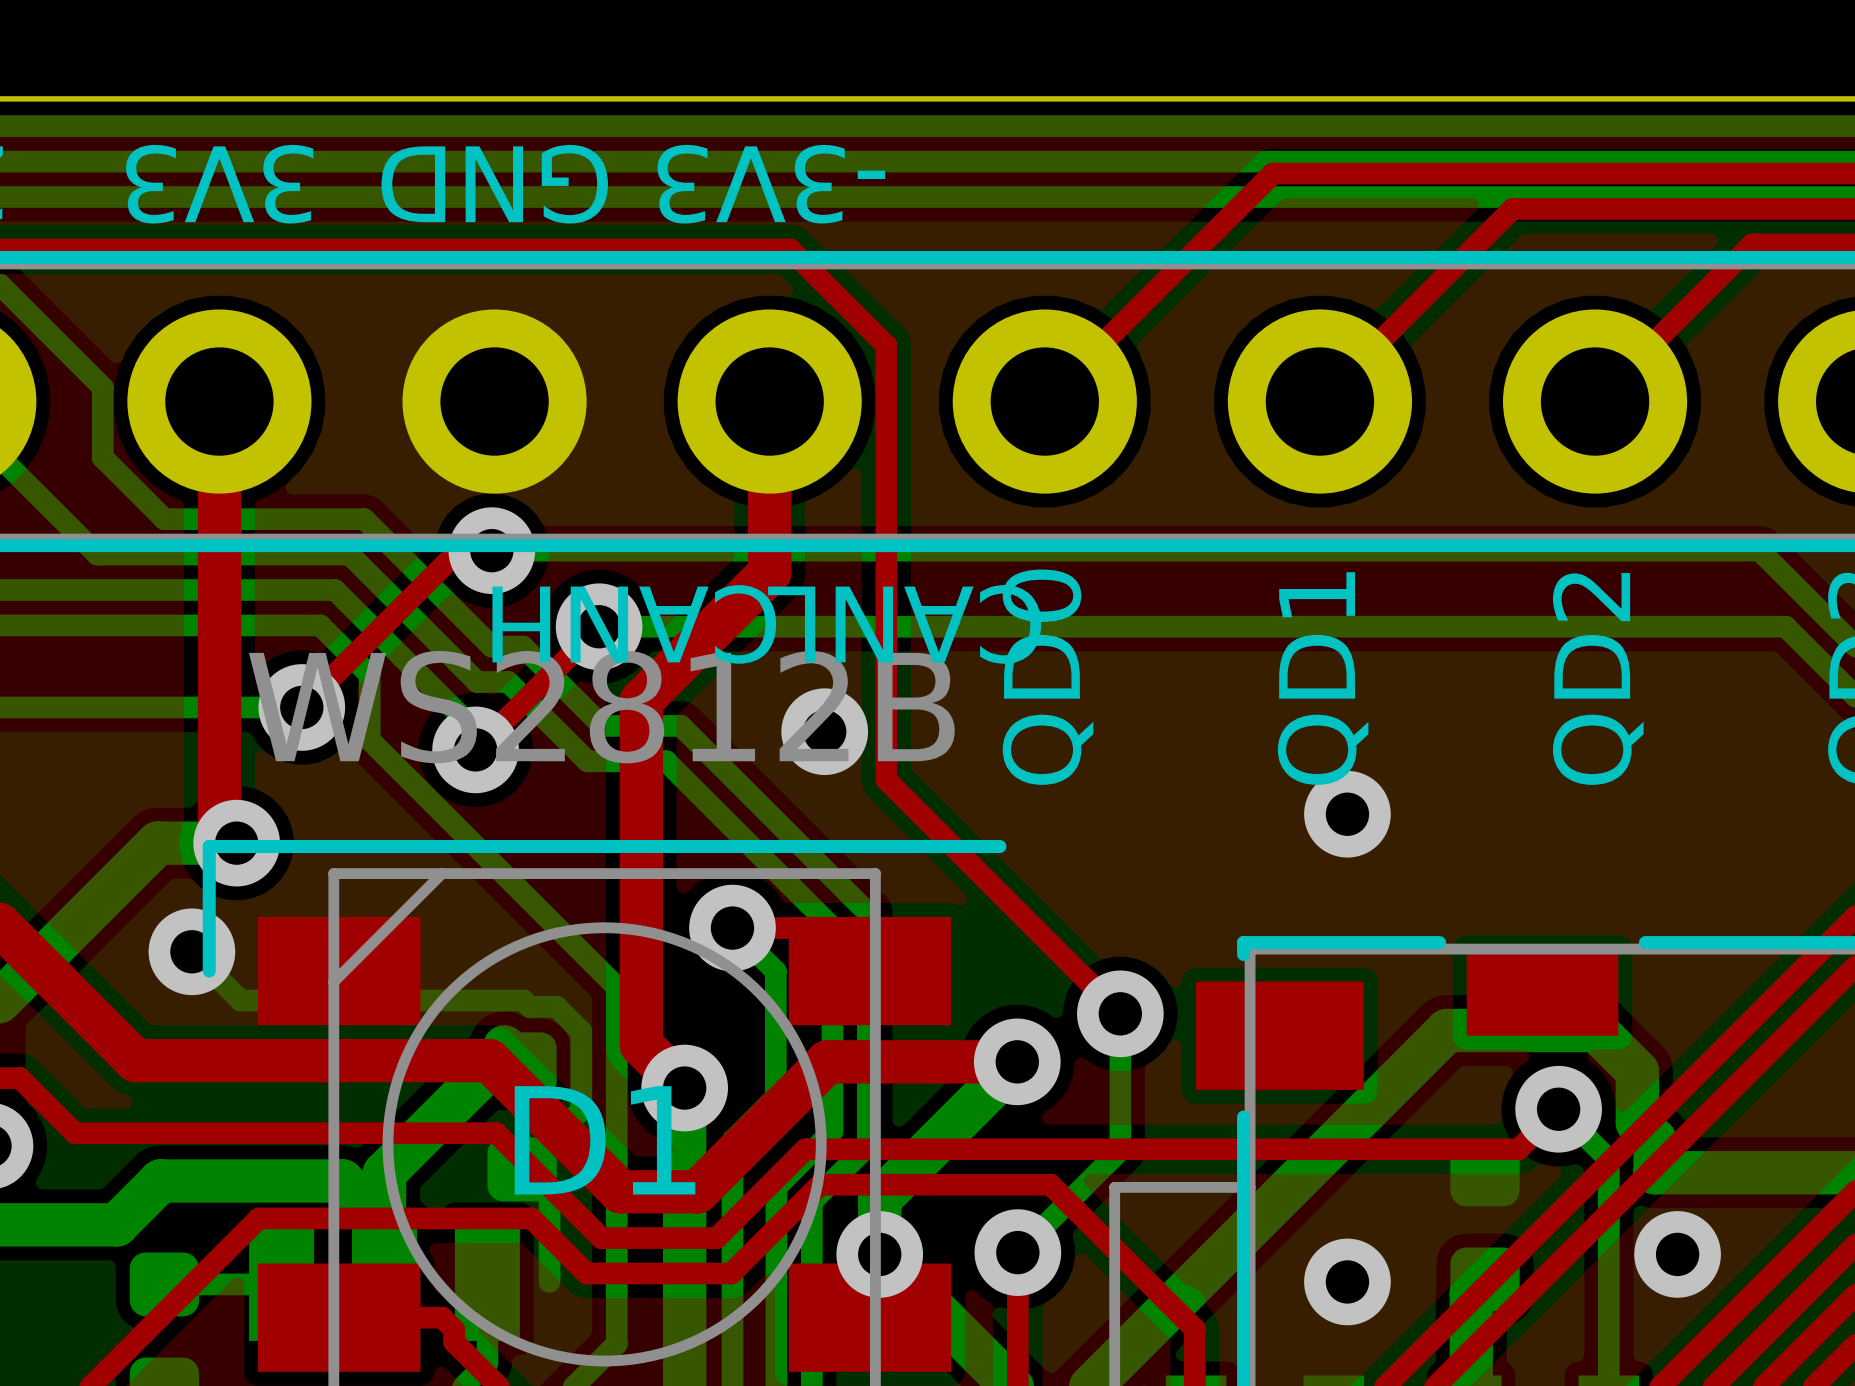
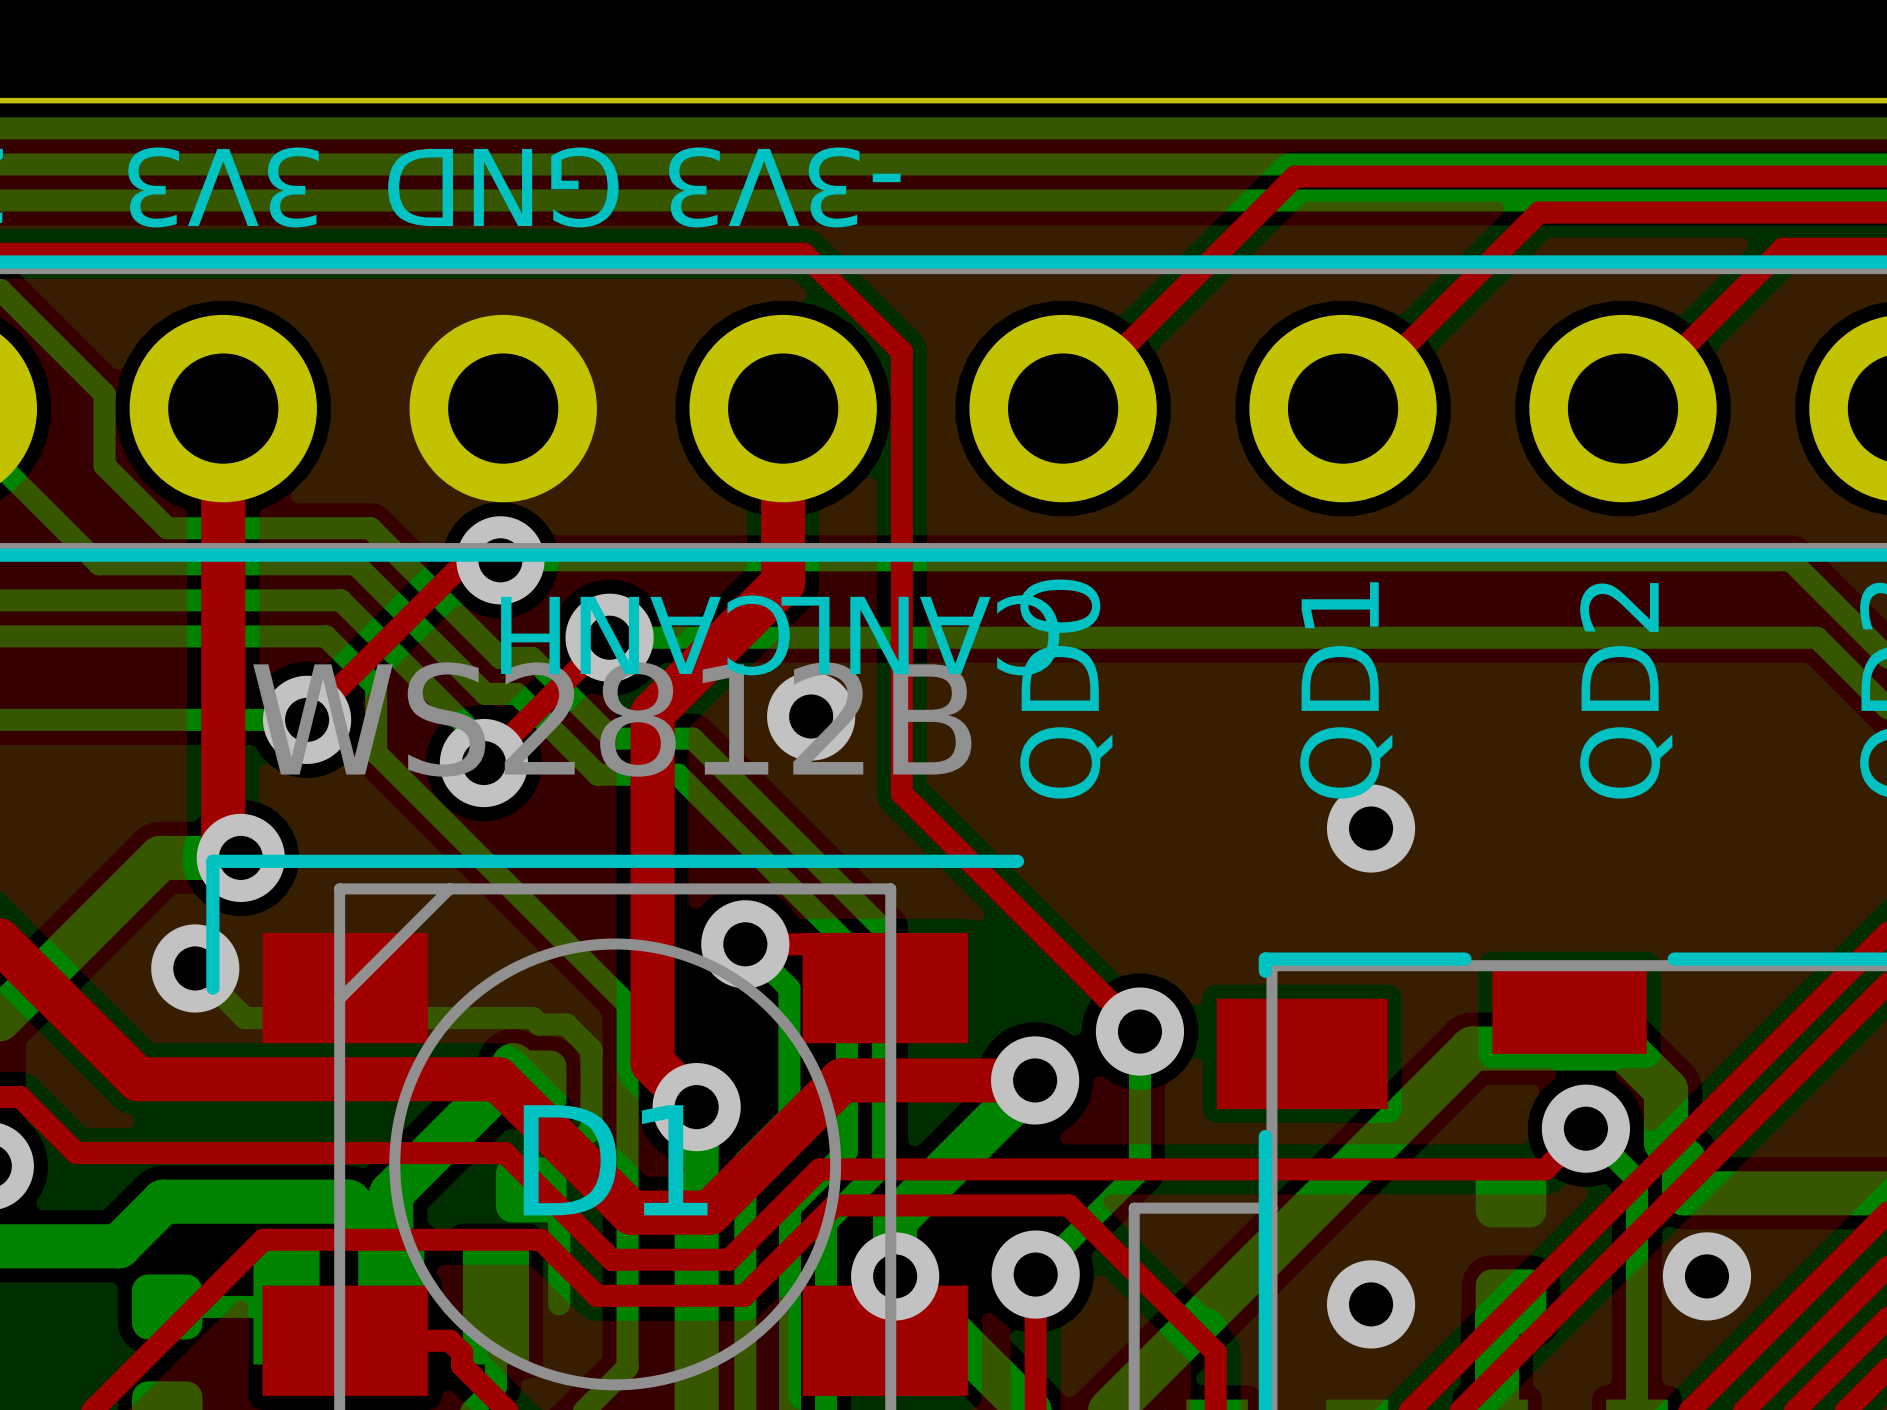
via position: (824, 731) -> (811, 716)

